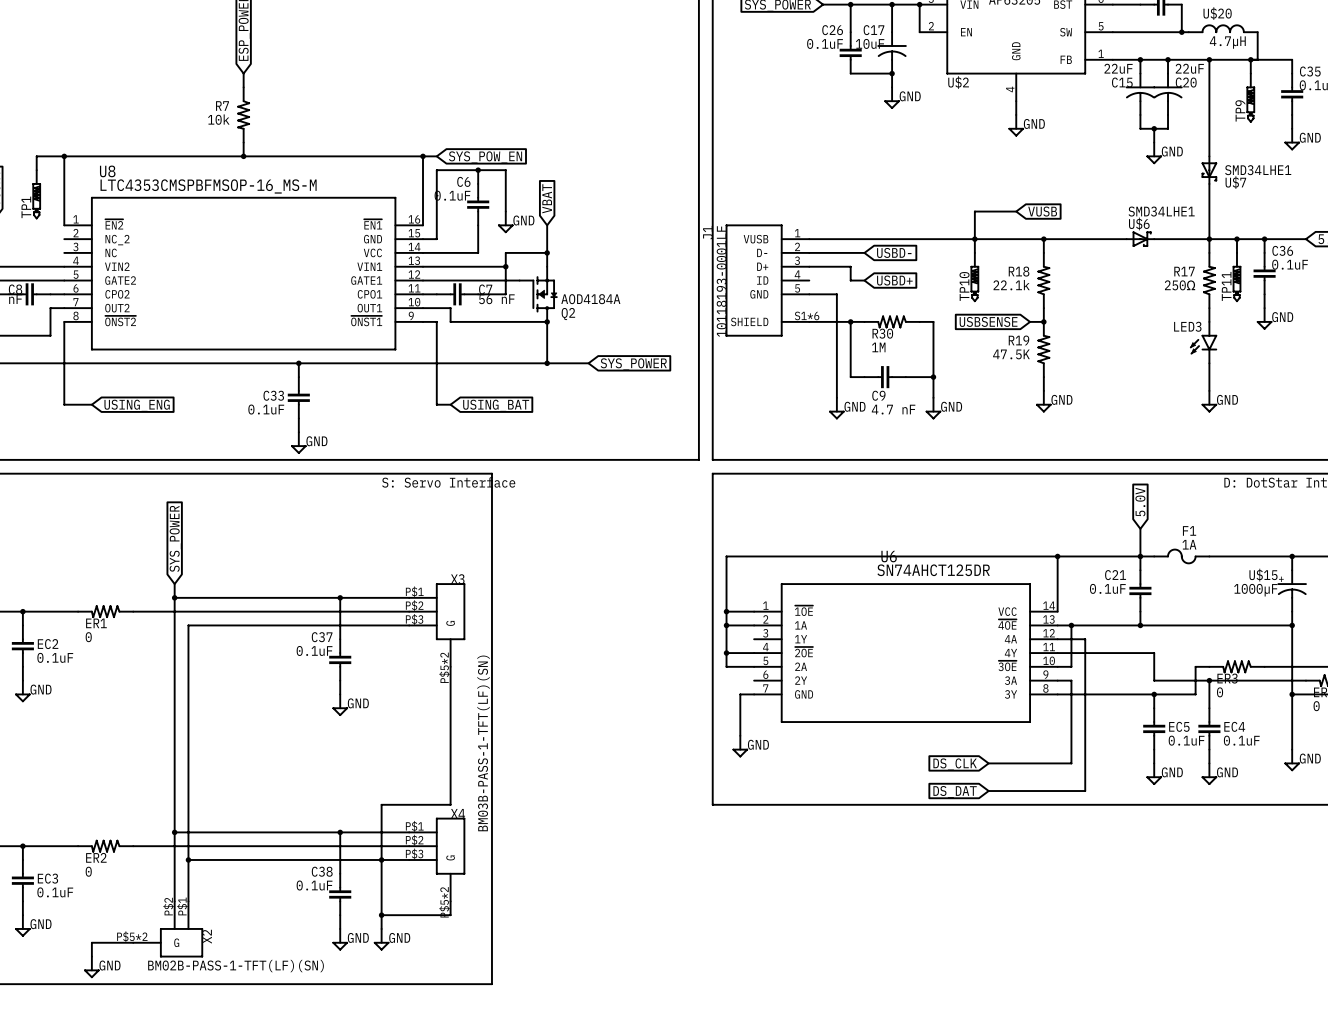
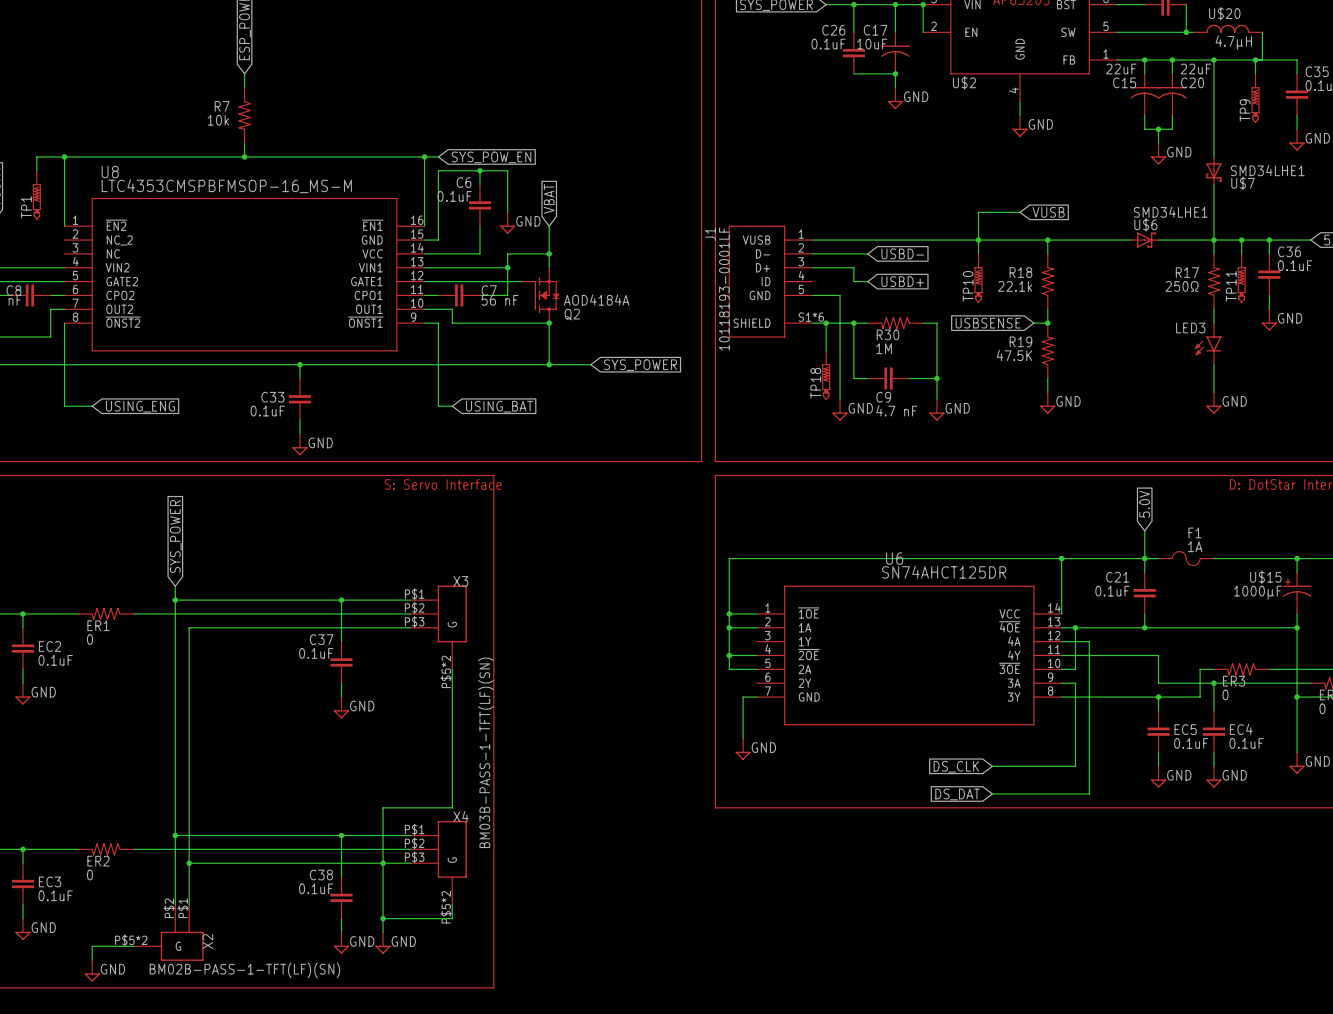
wire: none -> (826, 323) (826, 350)
junction: none -> (826, 323)
TP18: none -> (826, 375)

